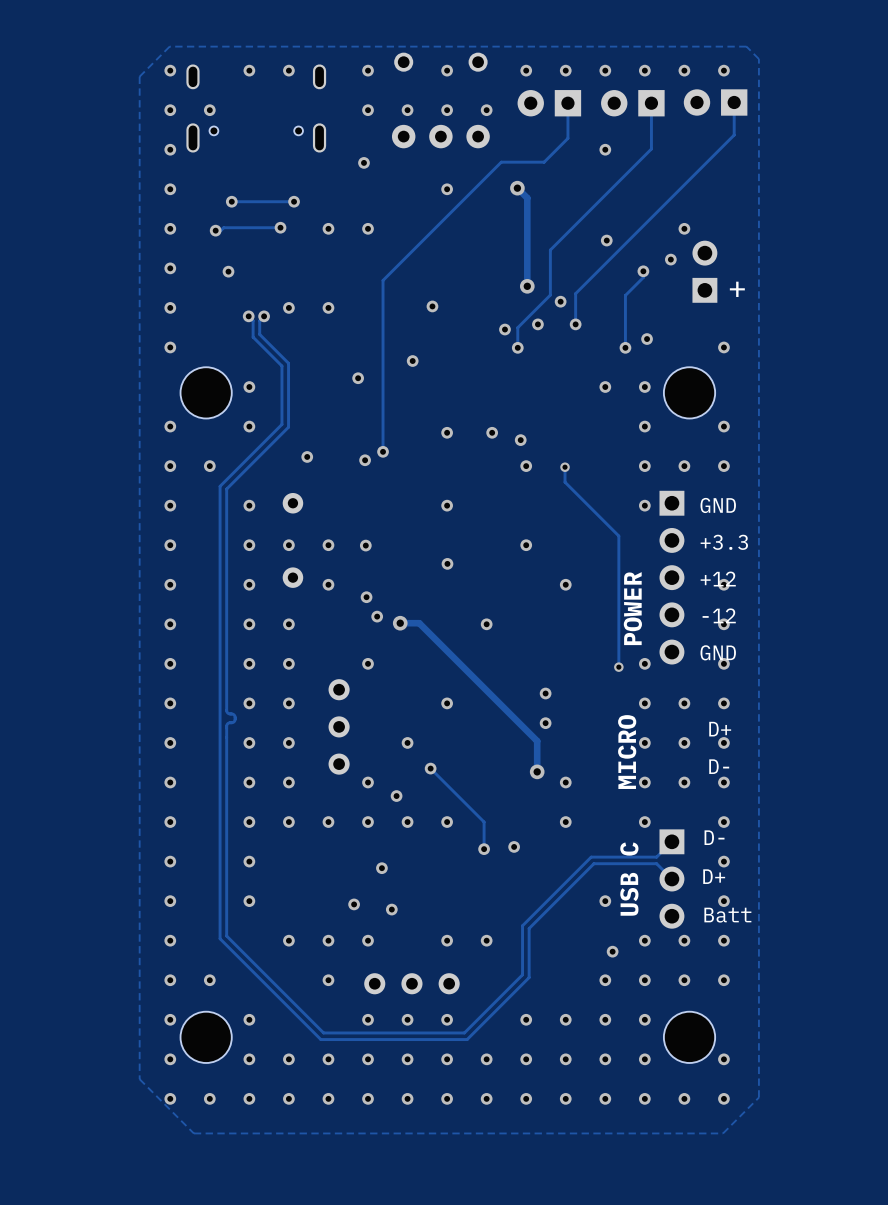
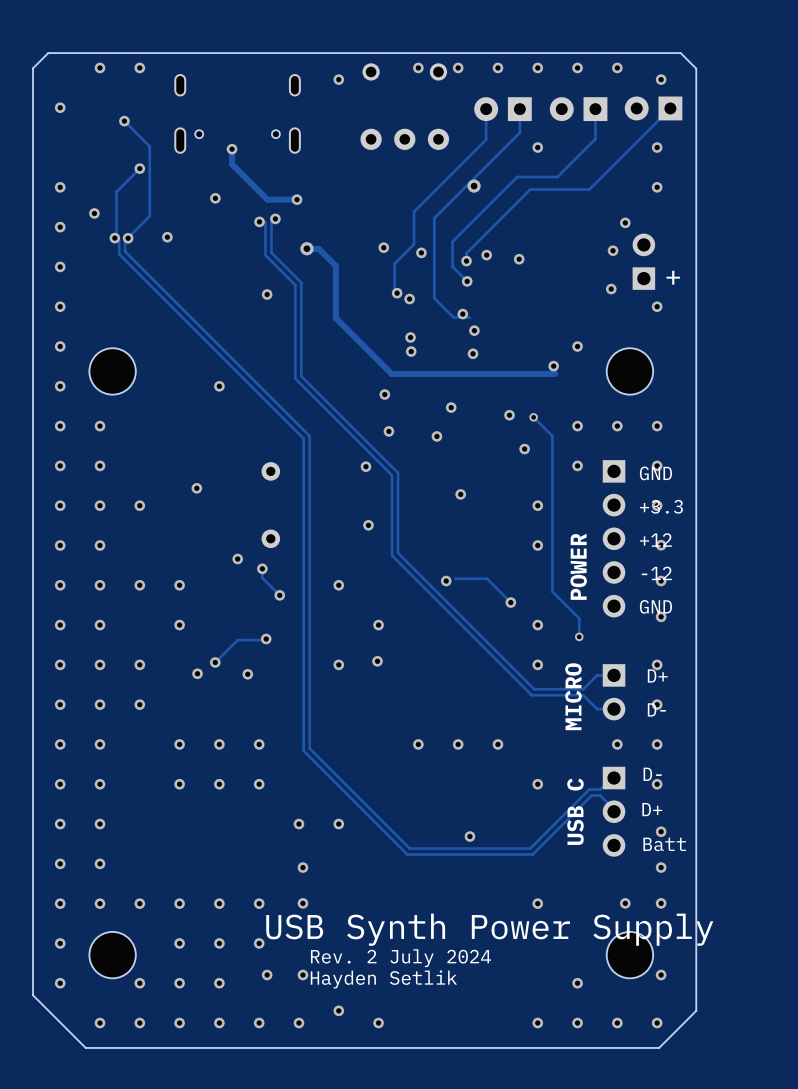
board edge: none -> (680, 53) (48, 53) (33, 68) (33, 995) (85, 1047) (659, 1047) (696, 1010) (696, 68) (680, 53)
zone outline: (746, 46) (758, 59) (758, 1097) (723, 1133) (193, 1133) (139, 1079) (139, 76) (169, 46) (746, 46) -> none
via: none -> (100, 67)
via: none -> (458, 67)
via: none -> (497, 67)
via: none -> (537, 67)
via: none -> (577, 67)
via position: (170, 70) -> (139, 67)
via: (249, 70) -> none
via: (288, 70) -> none
via position: (447, 70) -> (418, 67)
via: (526, 70) -> none
via: (565, 70) -> none
via: (605, 70) -> none
via: (644, 70) -> none
via position: (684, 70) -> (617, 67)
via: none -> (60, 107)
track: (734, 102) (734, 135) (575, 293) (575, 324) -> (670, 108) (589, 189) (530, 189) (466, 253) (466, 261)
track: none -> (486, 109) (486, 139) (413, 211) (413, 244) (394, 263) (394, 289)
via: (170, 110) -> none
via: (209, 110) -> none
via: (368, 110) -> none
via: (407, 110) -> none
via: (447, 110) -> none
via: (486, 110) -> none
track: none -> (124, 121) (149, 146) (149, 216) (125, 240) (125, 251) (309, 436) (309, 748) (409, 848) (530, 848) (589, 789) (600, 789) (614, 775)
via: none -> (124, 121)
track: (567, 129) (567, 138) (544, 162) (501, 162) (383, 280) (383, 451) -> (519, 132) (434, 218) (434, 298) (453, 317) (469, 317)
track: (651, 136) (651, 148) (550, 250) (550, 295) (517, 327) (517, 347) -> (595, 139) (557, 176) (517, 176) (452, 241) (452, 266) (467, 281)
via: none -> (657, 147)
track: none -> (232, 149) (232, 164) (267, 199) (296, 199)
via: none -> (232, 149)
via: (170, 149) -> none
via position: (605, 149) -> (537, 147)
via: (363, 162) -> none
track: none -> (139, 168) (116, 191) (116, 238) (119, 240) (119, 254) (303, 438) (303, 750) (407, 854) (532, 854) (591, 795) (600, 795) (614, 809)
via: none -> (139, 168)
track: (517, 188) (527, 198) (527, 286) -> none
via: none -> (60, 187)
via: (170, 189) -> none
via: (447, 189) -> none
via: none -> (657, 187)
track: (294, 201) (231, 201) -> none
via: (294, 201) -> none
via: none -> (296, 199)
via: none -> (94, 213)
track: none -> (261, 218) (265, 222) (265, 255) (295, 285) (295, 378) (392, 475) (392, 555) (531, 695) (583, 695) (597, 709) (614, 709)
track: none -> (275, 218) (271, 222) (271, 252) (301, 282) (301, 376) (398, 472) (398, 553) (534, 689) (583, 689) (597, 675) (614, 675)
via: none -> (275, 218)
track: (280, 227) (223, 227) (220, 230) (215, 230) -> none
via: (170, 228) -> none
via: (328, 228) -> none
via: (368, 228) -> none
via: (215, 230) -> none
via: none -> (60, 227)
via: (606, 240) -> none
via: none -> (167, 237)
via: none -> (114, 238)
via: none -> (128, 238)
via: none -> (383, 247)
track: none -> (306, 248) (318, 249) (335, 265) (335, 318) (391, 373) (555, 373)
via: none -> (306, 248)
via: none -> (421, 252)
via: none -> (486, 255)
via: (170, 268) -> none
via: none -> (519, 259)
via: (228, 271) -> none
via: none -> (466, 261)
track: (643, 271) (643, 277) (625, 295) (625, 347) -> none
via: (643, 271) -> none
via: none -> (60, 266)
via: (527, 286) -> none
via: none -> (467, 281)
via: (560, 301) -> none
via: none -> (611, 289)
via: (170, 307) -> none
via: (328, 307) -> none
via: none -> (409, 299)
track: (248, 316) (253, 320) (253, 337) (281, 366) (281, 424) (220, 486) (220, 938) (320, 1039) (467, 1039) (529, 977) (529, 928) (593, 863) (656, 863) (671, 879) -> none
via: (248, 316) -> none
track: (264, 316) (259, 320) (259, 334) (288, 363) (288, 427) (226, 489) (226, 710) (235, 717) (234, 721) (228, 723) (226, 726) (226, 936) (323, 1032) (464, 1032) (522, 974) (522, 925) (591, 857) (656, 857) (671, 841) -> none
via: (264, 316) -> none
via: none -> (60, 306)
via: (537, 324) -> none
via: (575, 324) -> none
via: (647, 339) -> none
via: (170, 347) -> none
via: (625, 347) -> none
via position: (723, 347) -> (657, 306)
via: none -> (410, 337)
via: (412, 361) -> none
via: none -> (60, 346)
via: none -> (577, 346)
via: none -> (411, 351)
via: none -> (473, 353)
via: (358, 378) -> none
via: (249, 387) -> none
via: (644, 387) -> none
part position: (206, 392) -> (112, 371)
via: none -> (60, 386)
via: none -> (219, 386)
via: none -> (384, 394)
via: (170, 426) -> none
via: (249, 426) -> none
via: (644, 426) -> none
via: (723, 426) -> none
via: (447, 432) -> none
via: (520, 440) -> none
via: none -> (509, 415)
track: none -> (533, 417) (552, 436) (552, 591) (579, 618) (579, 636)
via: (383, 451) -> none
via: none -> (60, 426)
via: none -> (100, 426)
via: none -> (577, 426)
via: none -> (657, 426)
via: (307, 456) -> none
via: none -> (388, 431)
via: (365, 460) -> none
via: none -> (436, 436)
via: (170, 466) -> none
via: (209, 466) -> none
via: (526, 466) -> none
via: (644, 466) -> none
via position: (684, 466) -> (617, 426)
via: (723, 466) -> none
track: (565, 467) (565, 482) (618, 536) (618, 667) -> none
via position: (565, 467) -> (533, 417)
via: none -> (524, 449)
via: none -> (60, 465)
via: none -> (100, 465)
via: none -> (657, 465)
via: none -> (365, 466)
via: (170, 505) -> none
via: (249, 505) -> none
via: (447, 505) -> none
via position: (644, 505) -> (577, 465)
via: none -> (196, 488)
via: none -> (60, 505)
via: none -> (100, 505)
via: none -> (139, 505)
via: none -> (537, 505)
via: none -> (657, 505)
via: (170, 545) -> none
via: (249, 545) -> none
via: (288, 545) -> none
via: (328, 545) -> none
via: (365, 545) -> none
via position: (526, 545) -> (460, 494)
via: none -> (368, 525)
via: (447, 563) -> none
via: (170, 584) -> none
via: (249, 584) -> none
via: (328, 584) -> none
via position: (565, 584) -> (537, 545)
via: none -> (60, 545)
via: none -> (100, 545)
via: (366, 597) -> none
via: none -> (237, 559)
track: none -> (262, 568) (262, 577) (279, 595)
via: none -> (262, 568)
via position: (377, 616) -> (338, 585)
track: none -> (455, 578) (487, 578) (510, 602)
track: (400, 623) (419, 623) (537, 741) (537, 771) -> none
via: (400, 623) -> none
via: (170, 624) -> none
via: (249, 624) -> none
via: (288, 624) -> none
via: none -> (60, 585)
via: none -> (100, 585)
via: none -> (139, 585)
via: none -> (179, 585)
via: none -> (279, 595)
via: none -> (510, 602)
via: (170, 663) -> none
via: (249, 663) -> none
via: (288, 663) -> none
via: (368, 663) -> none
via: (644, 663) -> none
via position: (618, 667) -> (579, 636)
via: none -> (60, 625)
via: none -> (100, 625)
via: none -> (179, 625)
via: none -> (378, 625)
via: none -> (537, 625)
track: none -> (266, 639) (237, 640) (215, 662)
via: none -> (266, 639)
via: (545, 693) -> none
via: (170, 703) -> none
via: (249, 703) -> none
via: (288, 703) -> none
via: (447, 703) -> none
via: (644, 703) -> none
via: (684, 703) -> none
via: (723, 703) -> none
via: none -> (377, 661)
via: none -> (215, 662)
via: none -> (60, 664)
via: none -> (100, 664)
via: none -> (139, 664)
via: none -> (338, 664)
via: none -> (537, 664)
via: none -> (657, 664)
via: (545, 723) -> none
via: none -> (197, 673)
part: (339, 726) -> none
via: none -> (247, 674)
via: (170, 742) -> none
via: (249, 742) -> none
via: (288, 742) -> none
via: (407, 742) -> none
via: (644, 742) -> none
via: (684, 742) -> none
via: (723, 742) -> none
part: none -> (614, 692)
via: none -> (60, 704)
via: none -> (100, 704)
via: none -> (139, 704)
via: none -> (657, 704)
track: (430, 768) (484, 822) (484, 849) -> none
via: (430, 768) -> none
via: (537, 771) -> none
via: (170, 782) -> none
via: (249, 782) -> none
via: (288, 782) -> none
via: (368, 782) -> none
via: (565, 782) -> none
via: (644, 782) -> none
via: (684, 782) -> none
via: (723, 782) -> none
via: (396, 796) -> none
via: none -> (60, 744)
via: none -> (100, 744)
via: none -> (179, 744)
via: none -> (219, 744)
via: none -> (259, 744)
via: none -> (458, 744)
via: none -> (497, 744)
via: none -> (617, 744)
via: none -> (657, 744)
via: (170, 822) -> none
via: (249, 822) -> none
via: (288, 822) -> none
via: (328, 822) -> none
via: (368, 822) -> none
via: (407, 822) -> none
via position: (447, 822) -> (418, 744)
via: (565, 822) -> none
via: (644, 822) -> none
via: (723, 822) -> none
via: (514, 846) -> none
via: none -> (60, 784)
via: none -> (100, 784)
via: none -> (179, 784)
via: none -> (219, 784)
via: none -> (259, 784)
via: none -> (537, 784)
via: none -> (657, 784)
via: (484, 849) -> none
via: (170, 861) -> none
via: (249, 861) -> none
via: (723, 861) -> none
via: (381, 868) -> none
via: none -> (60, 824)
via: none -> (100, 824)
via: none -> (298, 824)
via: none -> (338, 824)
via: (170, 901) -> none
via: (249, 901) -> none
via: (605, 901) -> none
via: (354, 904) -> none
via: none -> (469, 836)
via: (391, 909) -> none
via: none -> (60, 863)
via: none -> (100, 863)
via: (170, 940) -> none
via: (288, 940) -> none
via: (368, 940) -> none
via: (447, 940) -> none
via: (486, 940) -> none
via: (644, 940) -> none
via: (684, 940) -> none
via: (612, 951) -> none
via: none -> (60, 903)
via: none -> (100, 903)
via: none -> (139, 903)
via: (170, 980) -> none
via: none -> (179, 903)
via: (209, 980) -> none
via: none -> (219, 903)
via: none -> (259, 903)
via position: (605, 980) -> (537, 903)
via: (644, 980) -> none
part: (411, 983) -> none
text: none -> USB Synth Power Supply (489, 929)
via: (170, 1019) -> none
via position: (249, 1019) -> (219, 943)
via: (368, 1019) -> none
via: (407, 1019) -> none
via: (447, 1019) -> none
via: (526, 1019) -> none
via: (565, 1019) -> none
via: (605, 1019) -> none
via: (644, 1019) -> none
via: none -> (60, 943)
via: none -> (179, 943)
via: none -> (259, 943)
part position: (206, 1037) -> (112, 955)
text: none -> Rev. 2 July 2024 (400, 958)
via: (170, 1059) -> none
via position: (249, 1059) -> (219, 983)
via: (368, 1059) -> none
via: (407, 1059) -> none
via: (447, 1059) -> none
via: (486, 1059) -> none
via: (526, 1059) -> none
via: (565, 1059) -> none
via: (605, 1059) -> none
via: (644, 1059) -> none
text: none -> Hayden Setlik (383, 979)
via: none -> (60, 983)
via: none -> (139, 983)
via: none -> (179, 983)
via: none -> (577, 983)
via: (170, 1098) -> none
via: (209, 1098) -> none
via: (249, 1098) -> none
via position: (288, 1098) -> (259, 1023)
via position: (328, 1098) -> (298, 1023)
via position: (407, 1098) -> (378, 1023)
via: (447, 1098) -> none
via: (486, 1098) -> none
via: (526, 1098) -> none
via: (565, 1098) -> none
via: (605, 1098) -> none
via: (644, 1098) -> none
via position: (684, 1098) -> (617, 1023)
via position: (723, 1098) -> (657, 1023)
via: none -> (100, 1023)
via: none -> (139, 1023)
via: none -> (179, 1023)
via: none -> (219, 1023)
via: none -> (537, 1023)
via: none -> (577, 1023)

